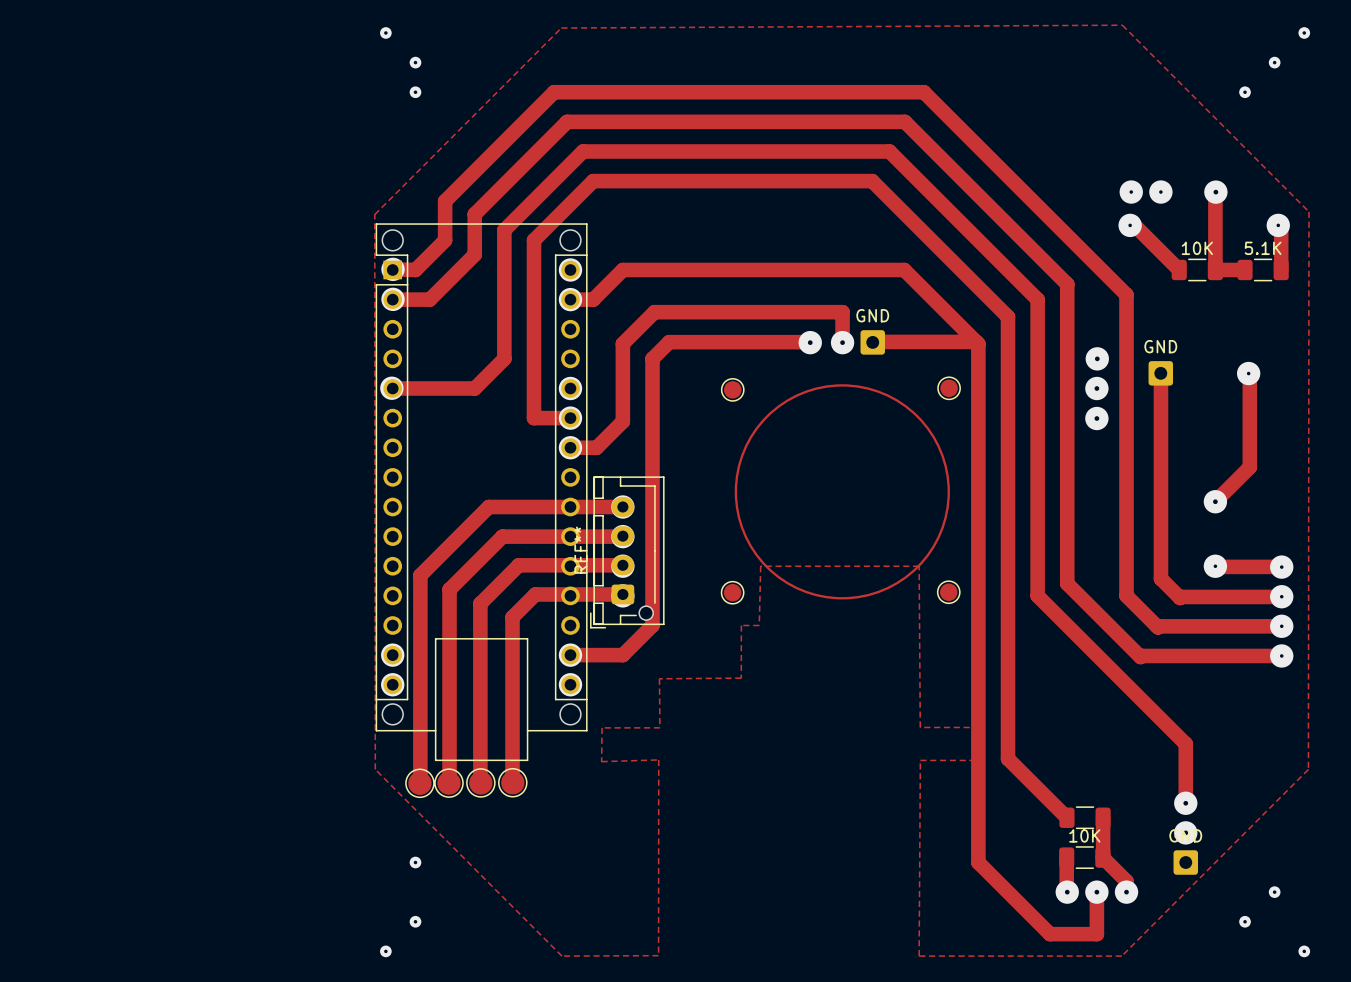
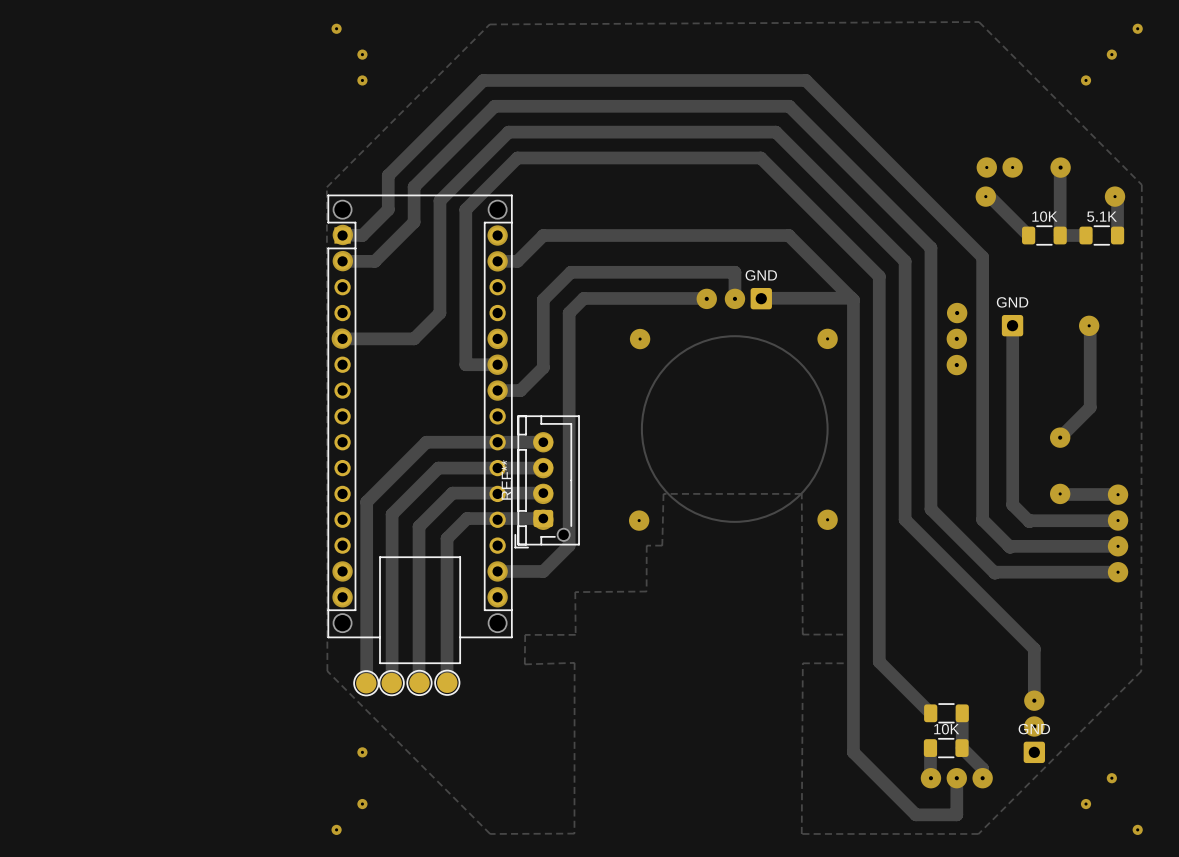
via: none -> (640, 339)
via: none -> (827, 338)
part: (949, 388) -> none
part: (732, 389) -> none
part: (732, 592) -> none
part: (948, 592) -> none
via: none -> (827, 519)
via: none -> (639, 520)

